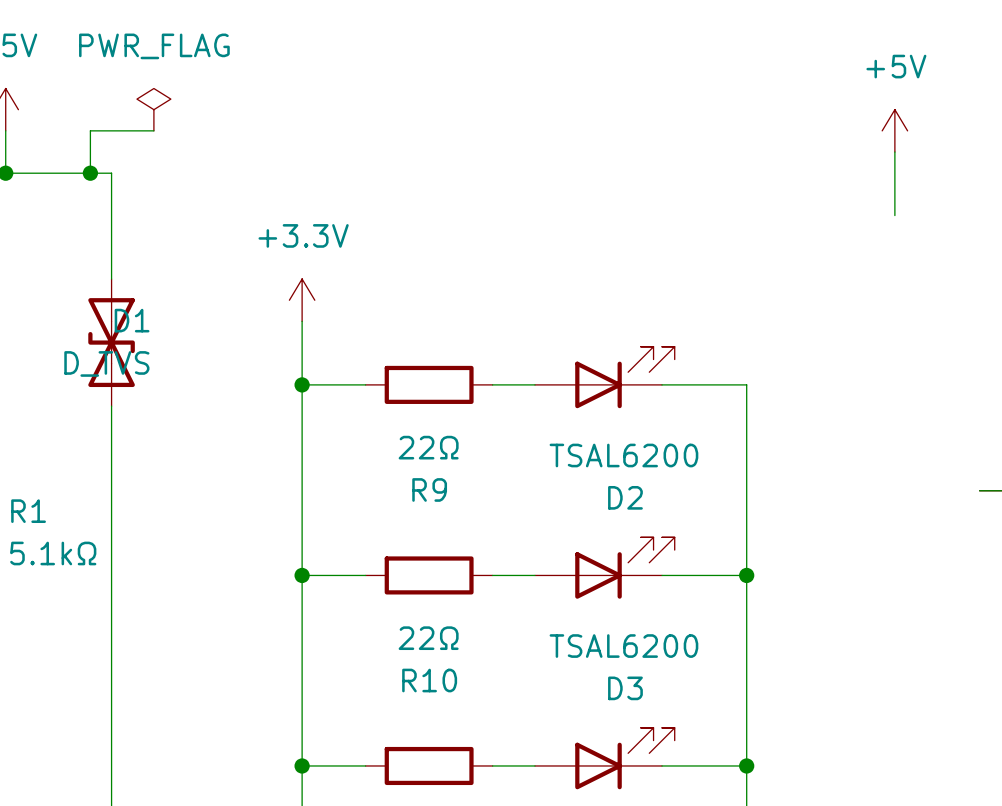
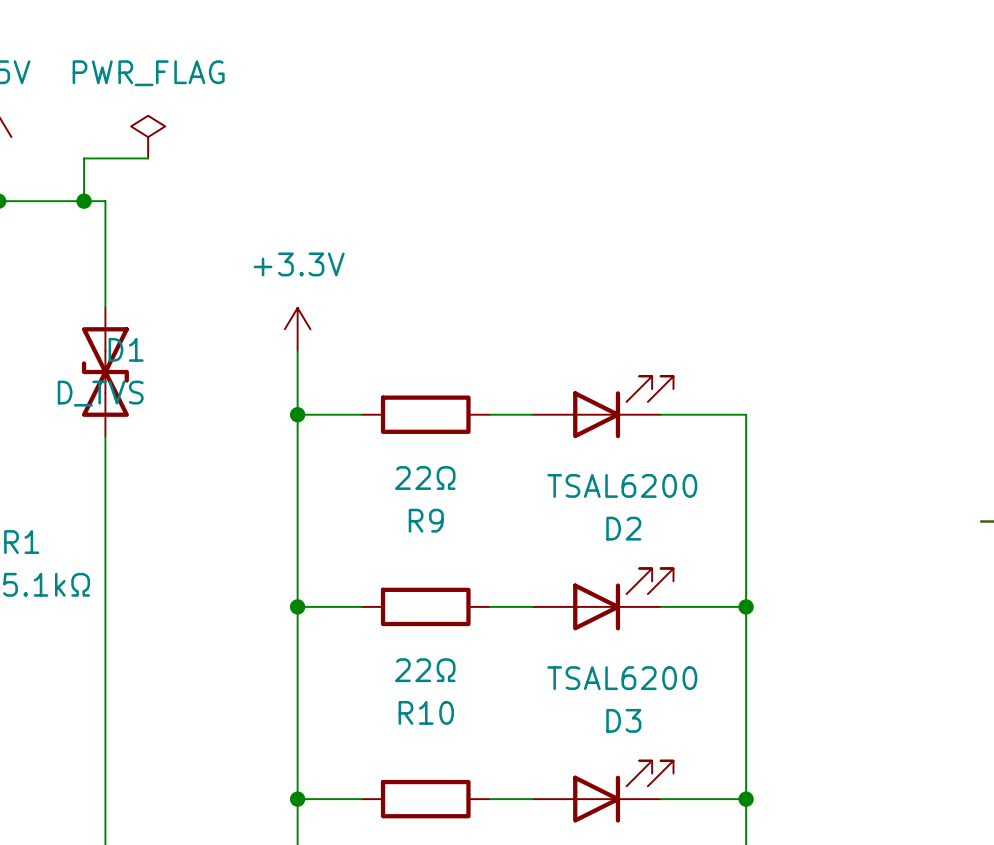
power symbol: +5V (894, 130) -> none
wire: (894, 152) (894, 215) -> none

